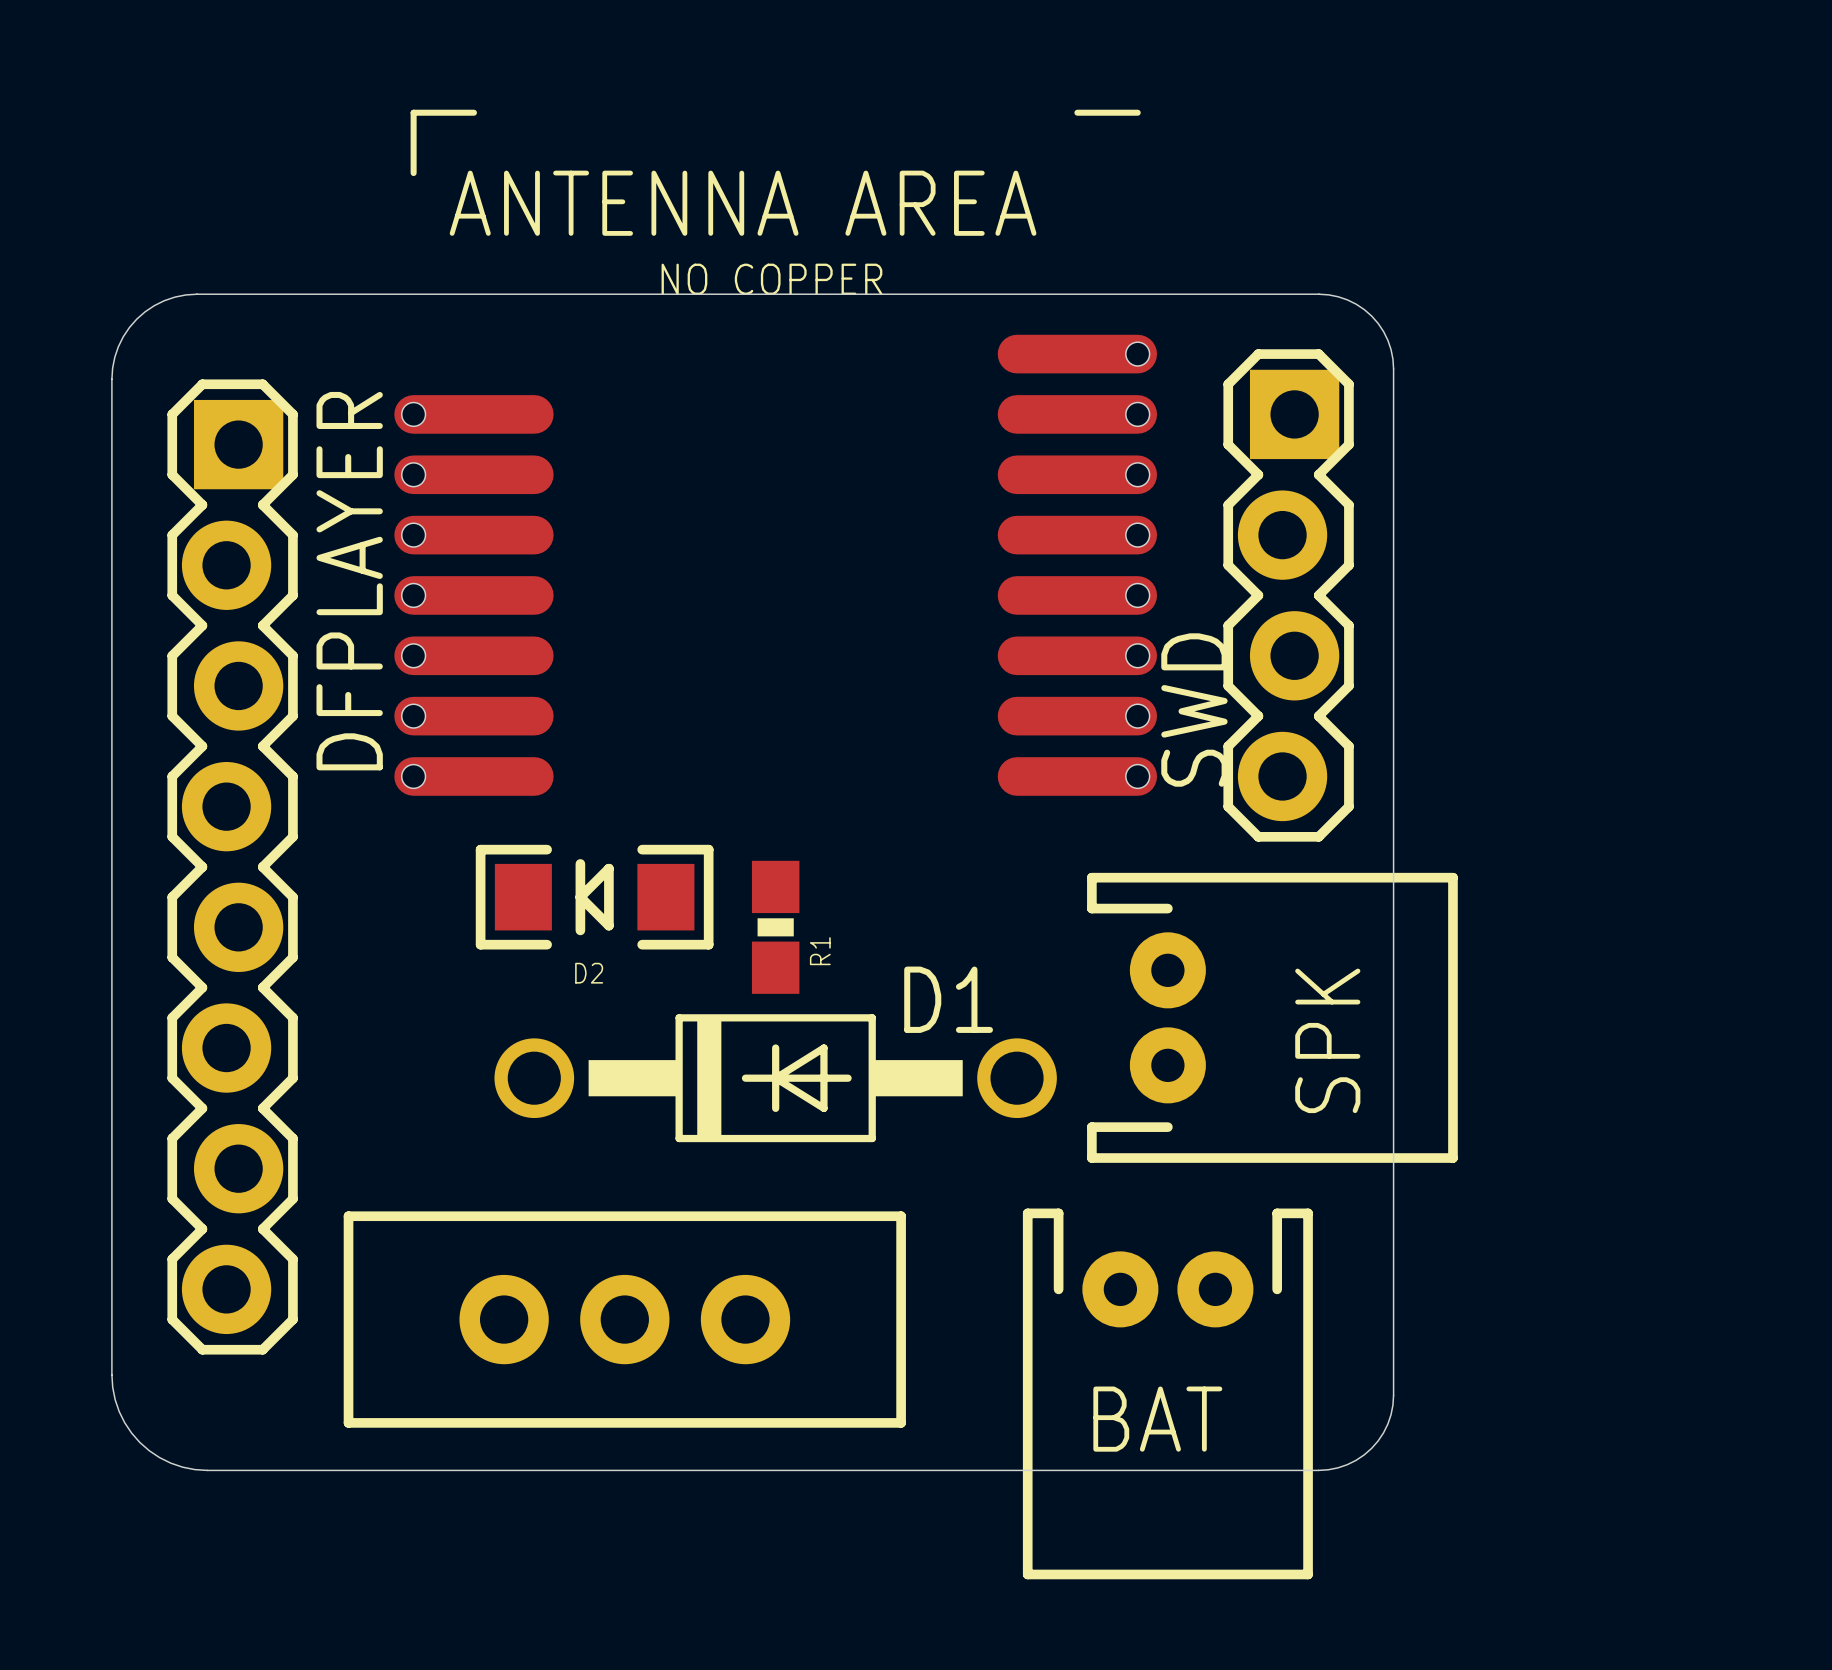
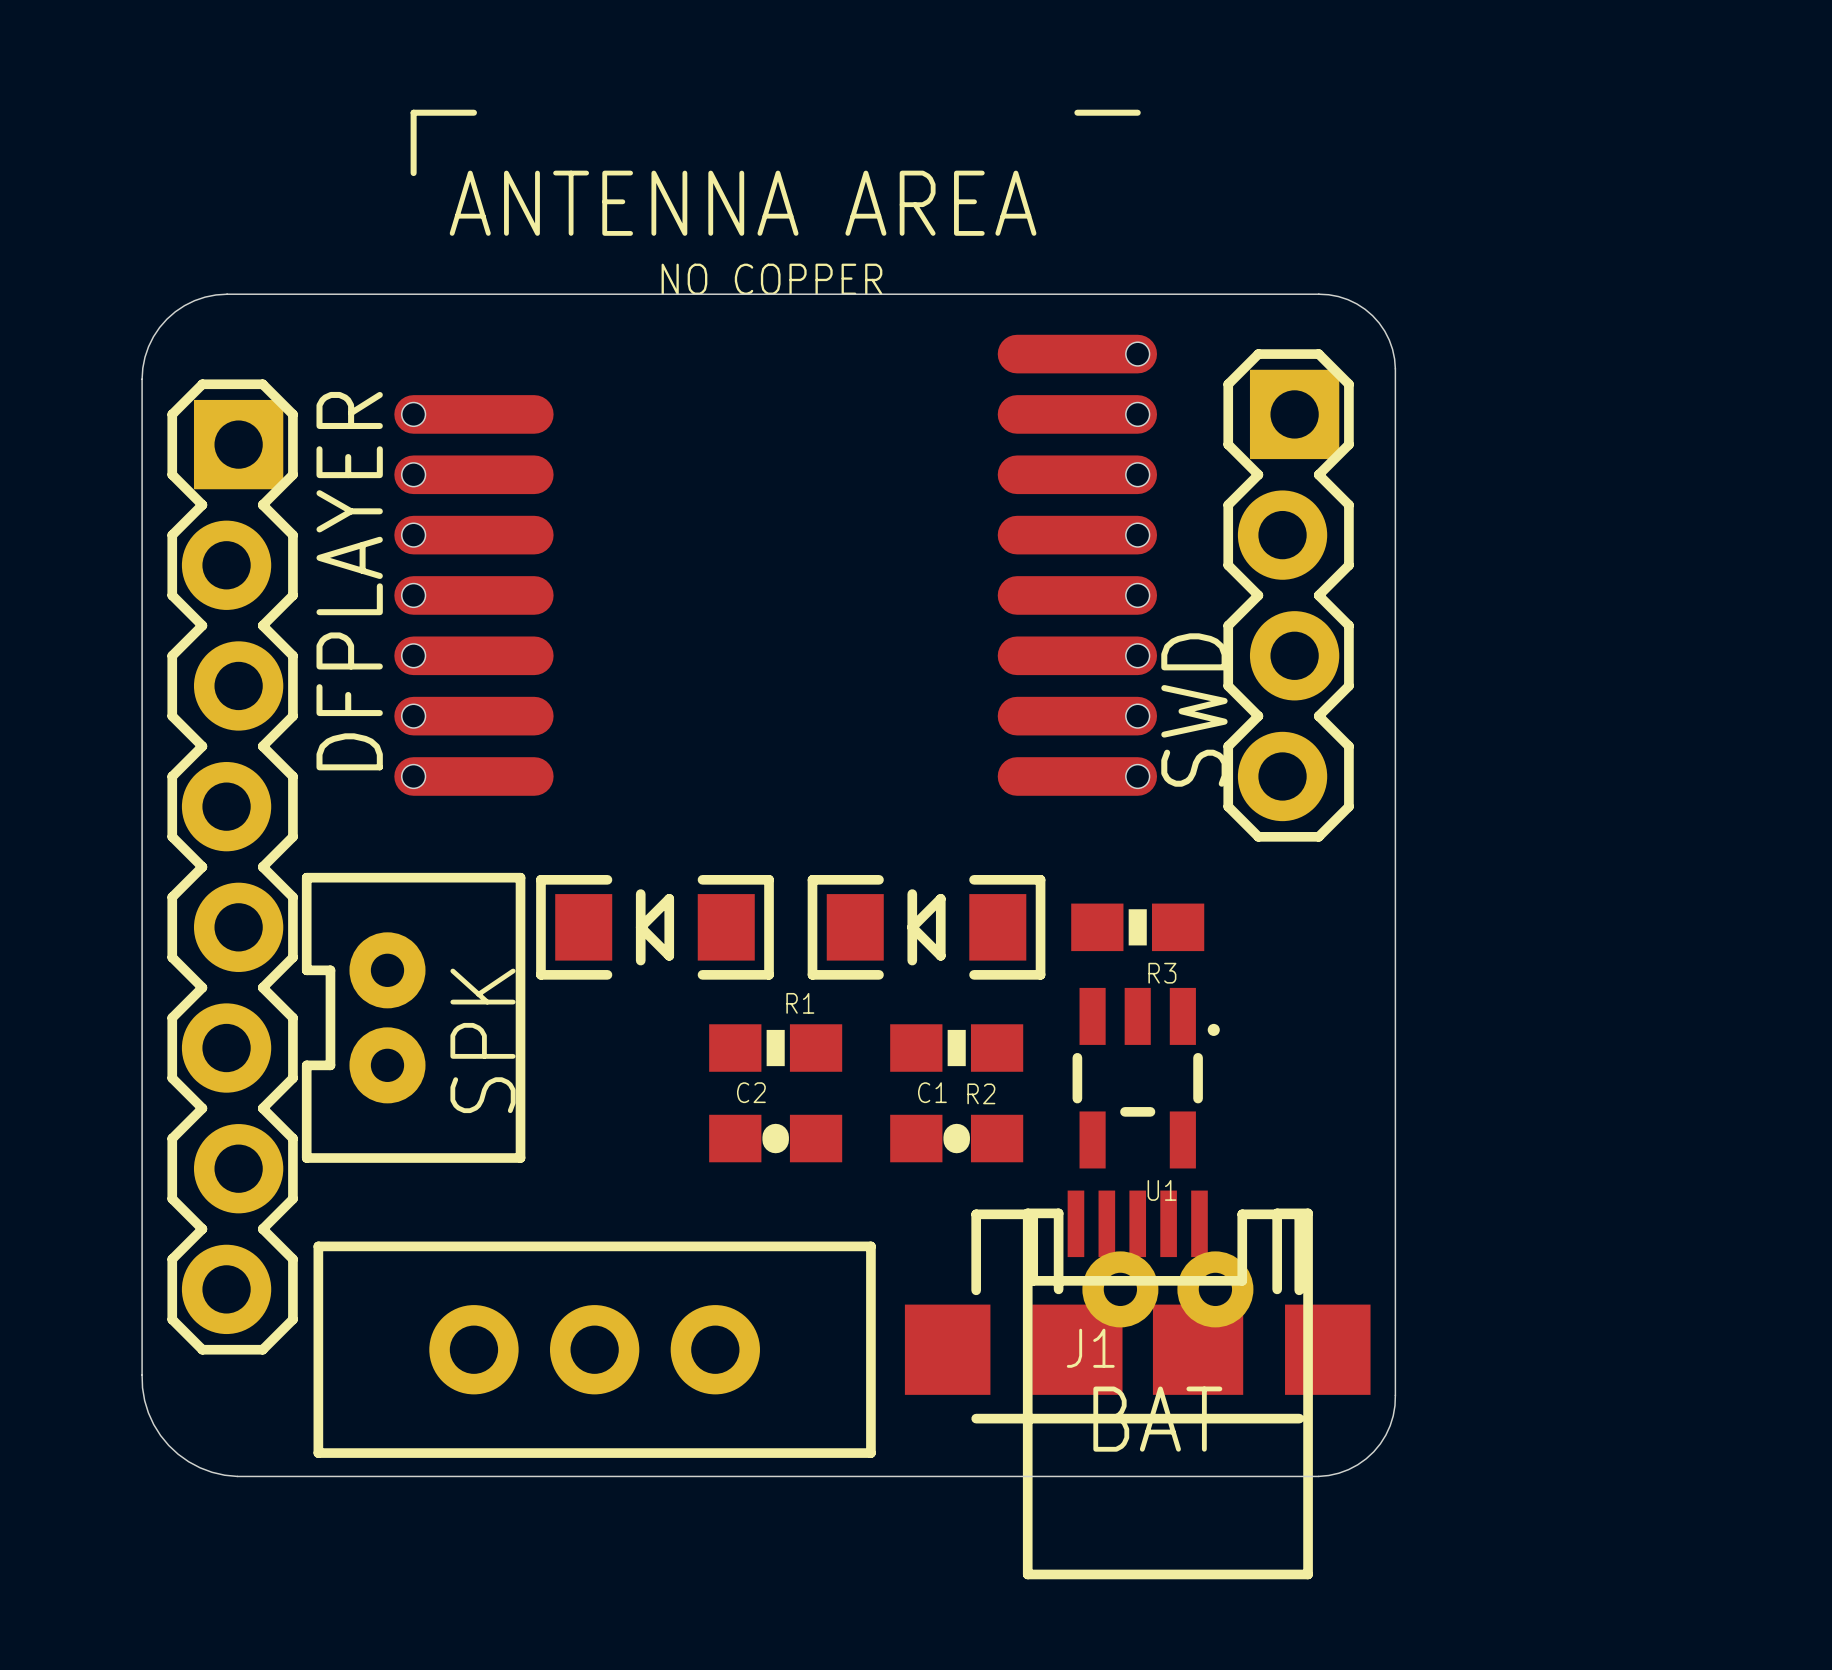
board edge: (227, 294) (196, 294) (174, 297) (145, 311) (123, 336) (114, 357) (111, 379) (112, 1387) (115, 1399) (124, 1422) (139, 1442) (159, 1457) (170, 1463) (182, 1467) (207, 1470) (1318, 1470) (1347, 1464) (1371, 1448) (1387, 1424) (1393, 1395) (1393, 368) (1387, 340) (1371, 316) (1347, 299) (1318, 294) -> (227, 294) (194, 300) (175, 311) (153, 336) (142, 368) (142, 1375) (142, 1387) (148, 1412) (160, 1435) (168, 1445) (178, 1454) (200, 1467) (212, 1472) (237, 1476) (1318, 1476) (1348, 1469) (1373, 1451) (1390, 1425) (1395, 1395) (1395, 368) (1389, 340) (1372, 315) (1347, 299) (1318, 294)
D2: (594, 897) -> none
part: none -> (654, 927)
R1 rotation: 0° (775, 927) -> 90° clockwise (775, 1048)
R1 position: (775, 927) -> (775, 1048)
part: none -> (926, 927)
R3: none -> (1137, 927)
SPK: none -> (413, 1017)
SPK: (1272, 1017) -> none
R2: none -> (956, 1048)
D1: (775, 1078) -> none
U1: none -> (1146, 1078)
C2: none -> (775, 1138)
C1: none -> (956, 1138)
J1: none -> (1137, 1307)
part position: (624, 1319) -> (594, 1349)

